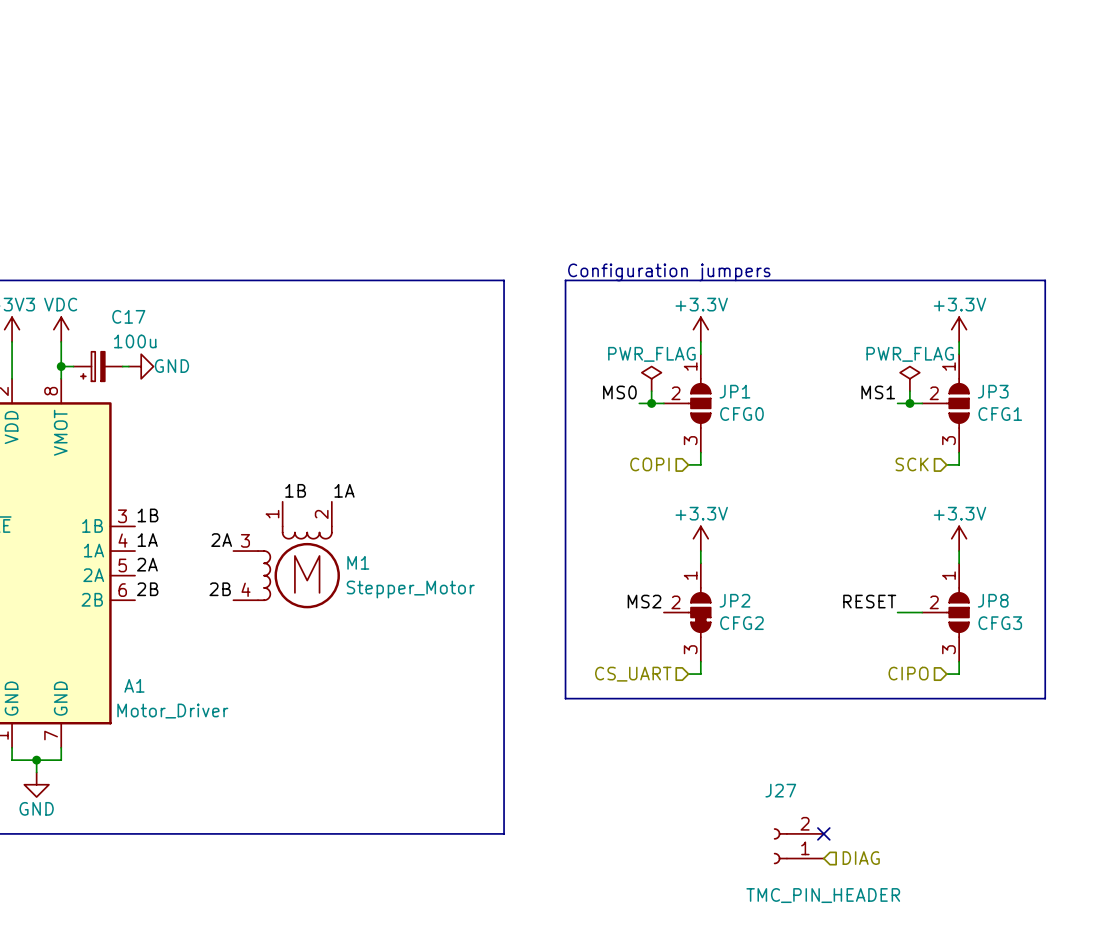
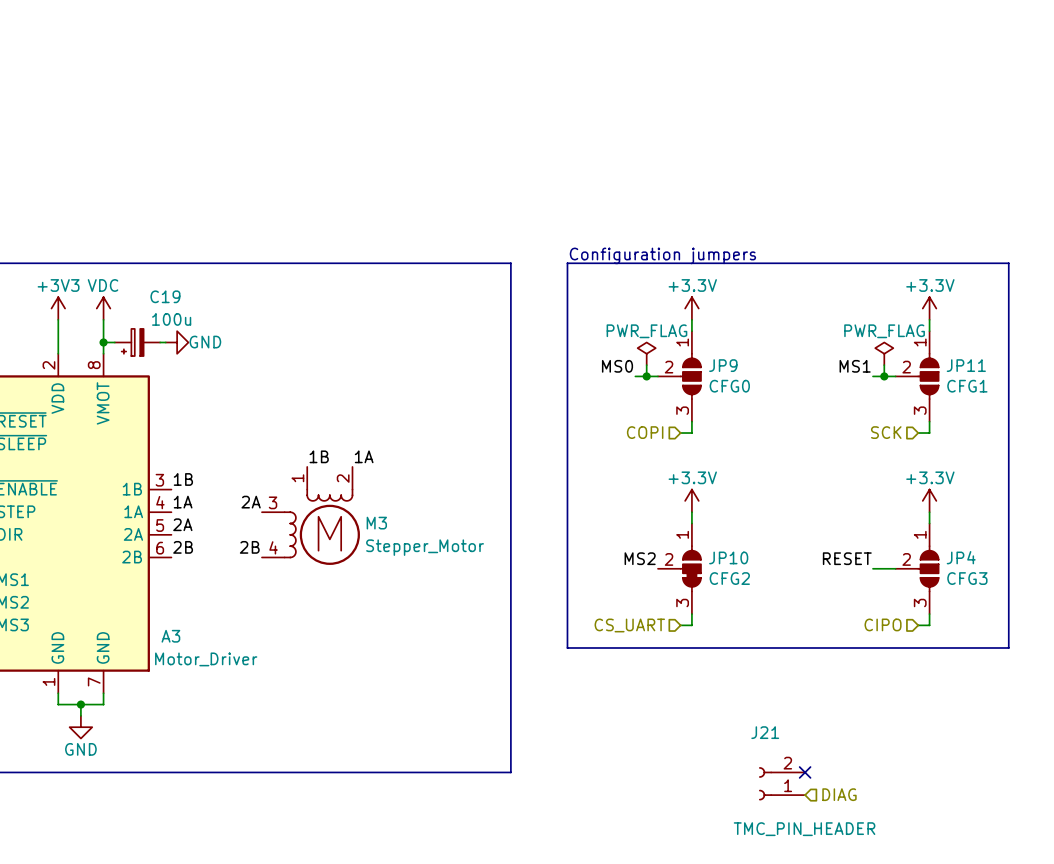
C17 name: C17 (128, 316) -> C19 (165, 296)
JP1 name: JP1 (734, 391) -> JP9 (723, 365)
JP3 name: JP3 (993, 391) -> JP11 (966, 365)
M1 name: M1 (358, 562) -> M3 (376, 523)
JP2 name: JP2 (734, 600) -> JP10 (728, 557)
JP8 name: JP8 (993, 600) -> JP4 (961, 557)
A1 name: A1 (134, 685) -> A3 (170, 636)
J27 name: J27 (780, 790) -> J21 (765, 732)

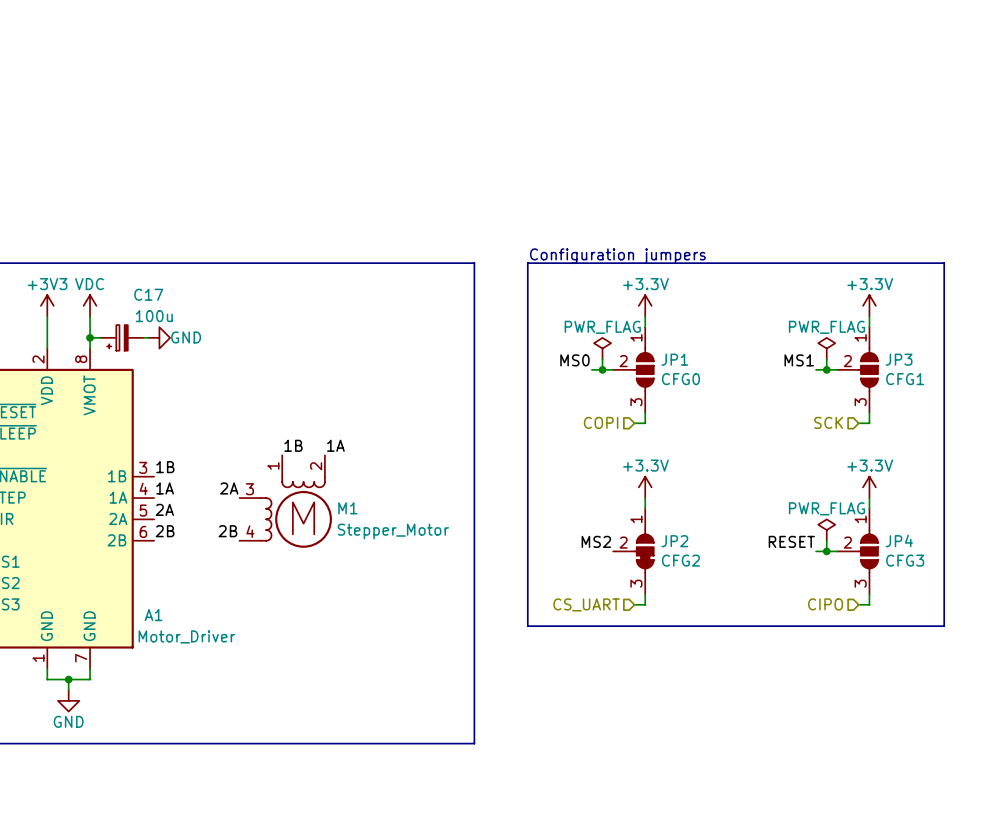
C19 name: C19 (165, 296) -> C17 (148, 294)
JP9 name: JP9 (723, 365) -> JP1 (674, 359)
JP11 name: JP11 (966, 365) -> JP3 (899, 359)
M3 name: M3 (376, 523) -> M1 (347, 508)
power symbol: none -> PWR_FLAG (826, 530)
JP10 name: JP10 (728, 557) -> JP2 (674, 541)
wire: none -> (826, 540) (826, 551)
junction: none -> (826, 551)
A3 name: A3 (170, 636) -> A1 (153, 615)
no-connect mark: (805, 772) -> none
J21: TMC_PIN_HEADER (782, 783) -> none
hierarchical label: DIAG (839, 794) -> none

